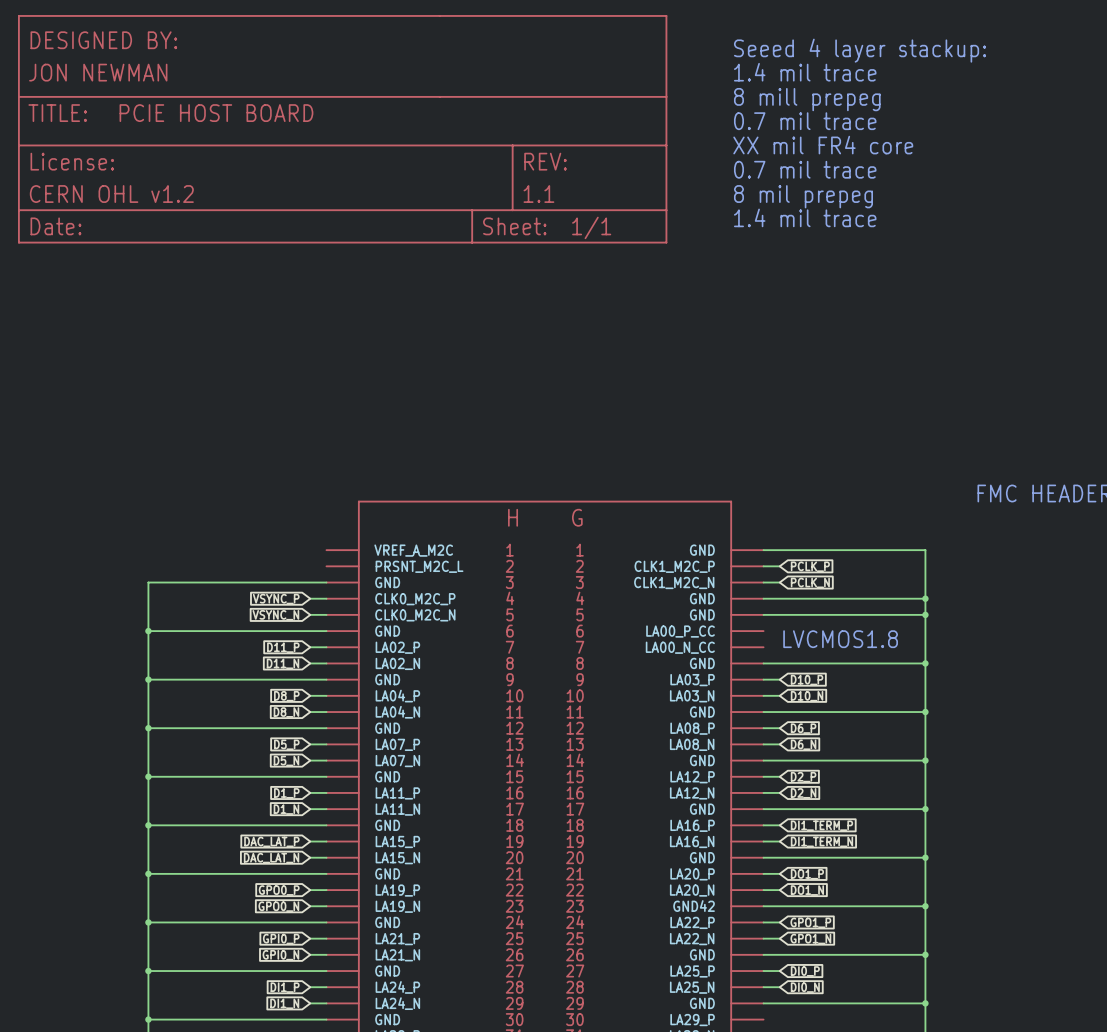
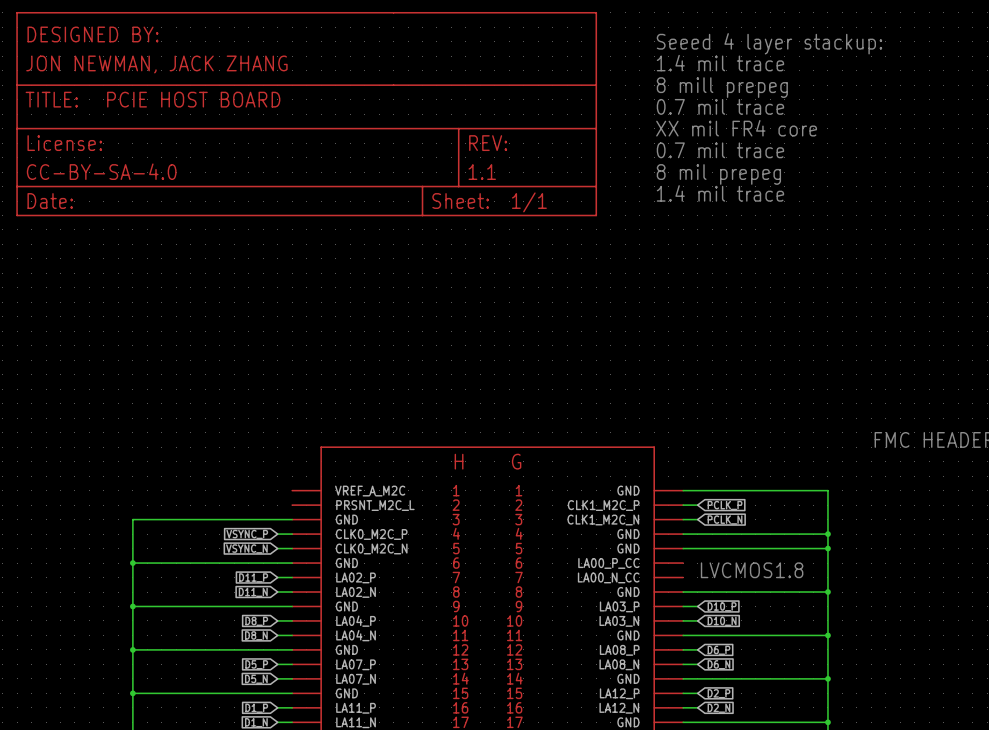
part text: JON NEWMAN (98, 72) -> JON NEWMAN, JACK ZHANG (156, 64)
part text: CERN OHL v1.2 (111, 194) -> CC-BY-SA-4.0 (101, 171)

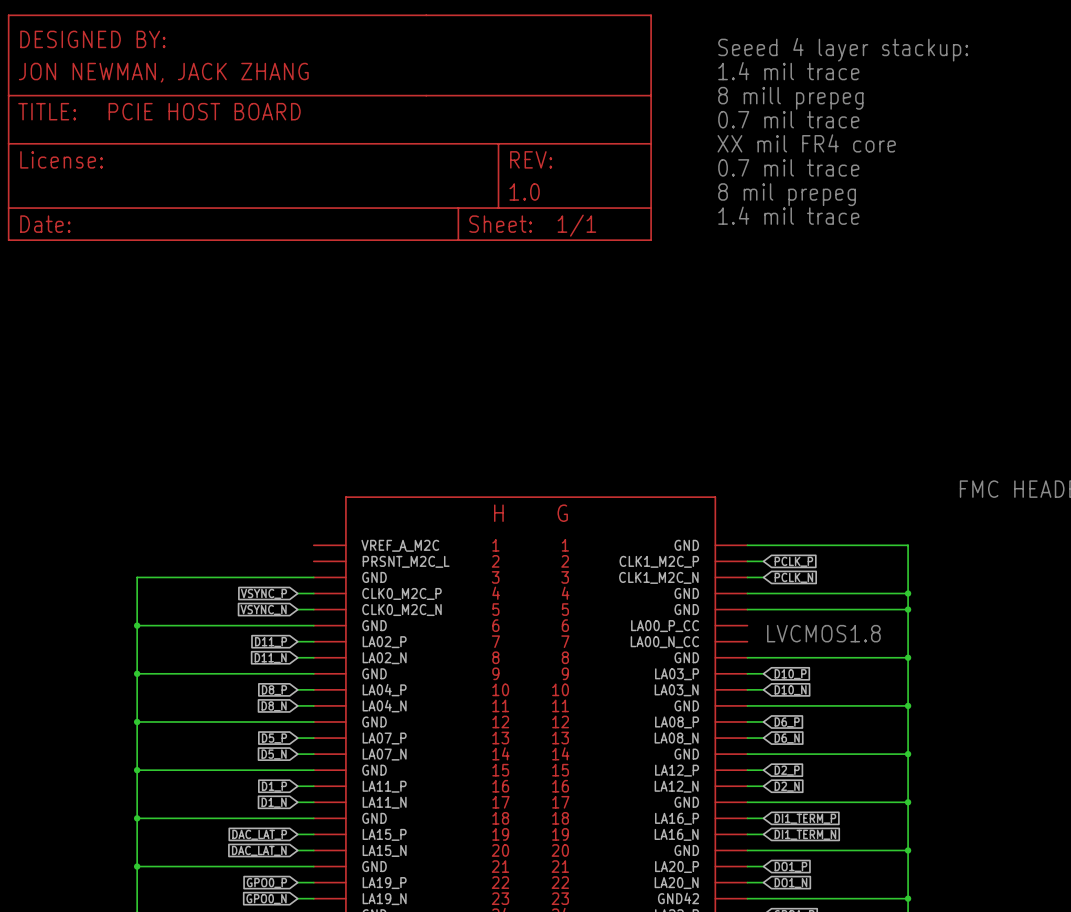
part text: CC-BY-SA-4.0 (101, 171) -> none
part text: 1.1 (482, 172) -> 1.0 (524, 191)

